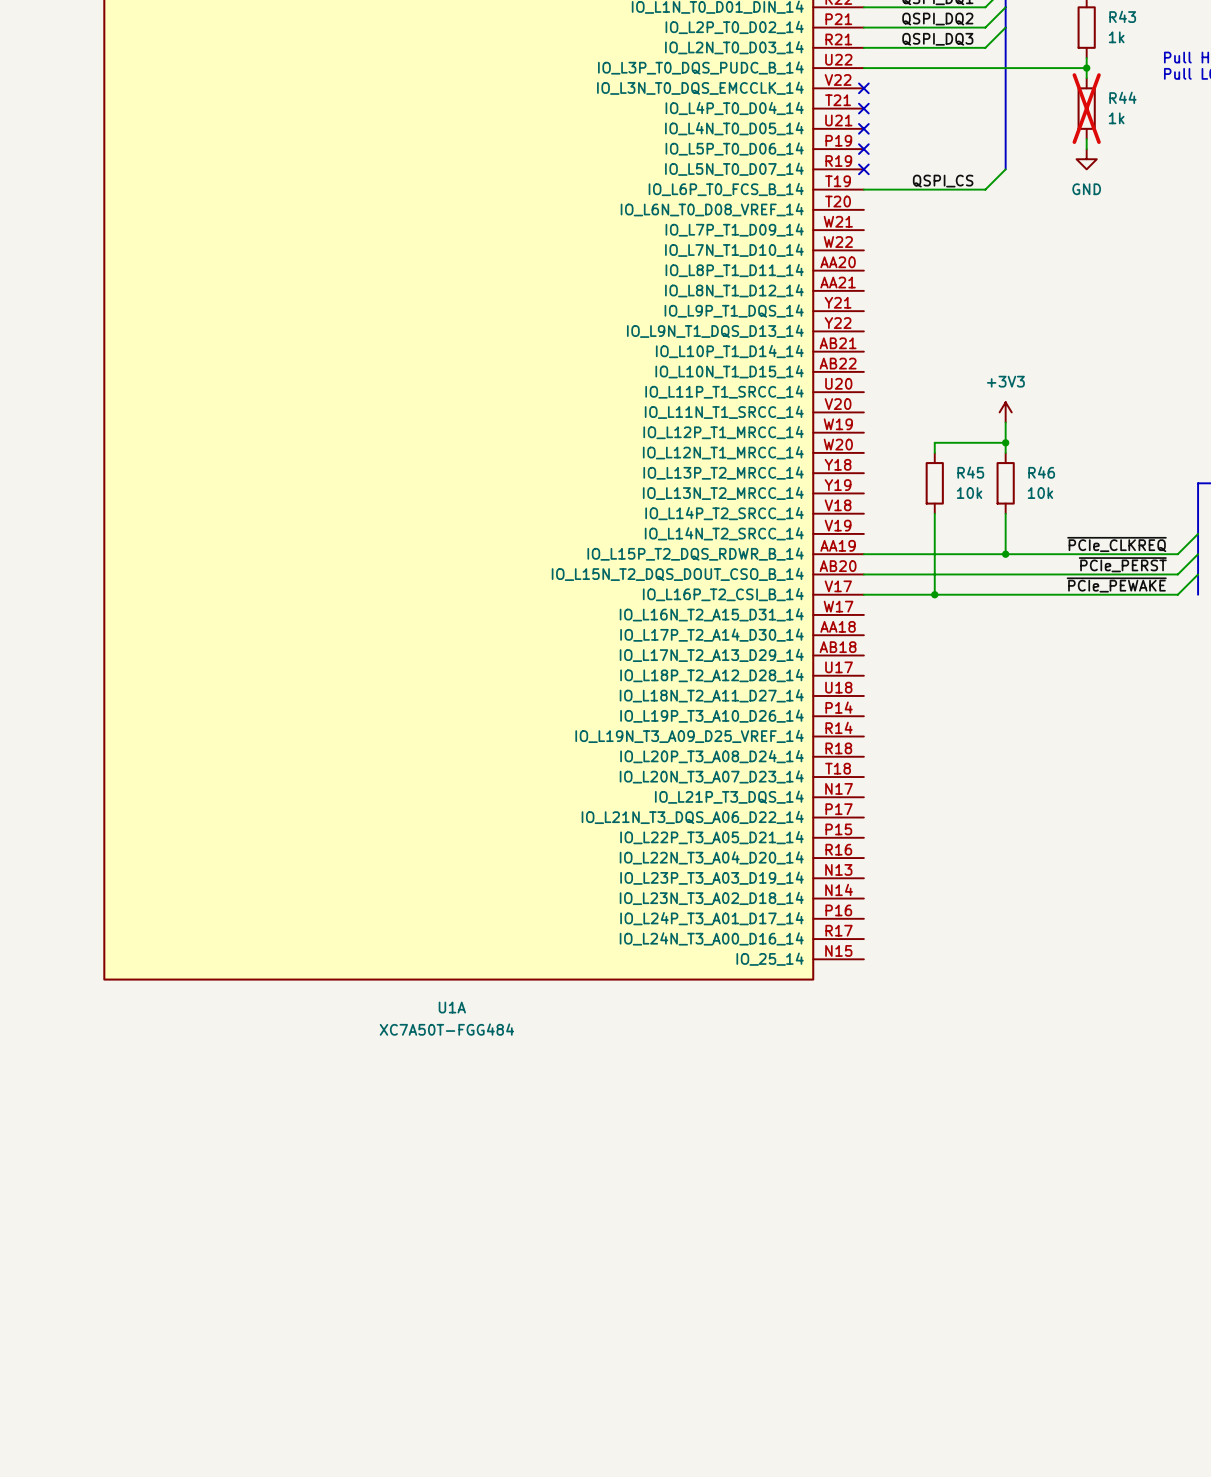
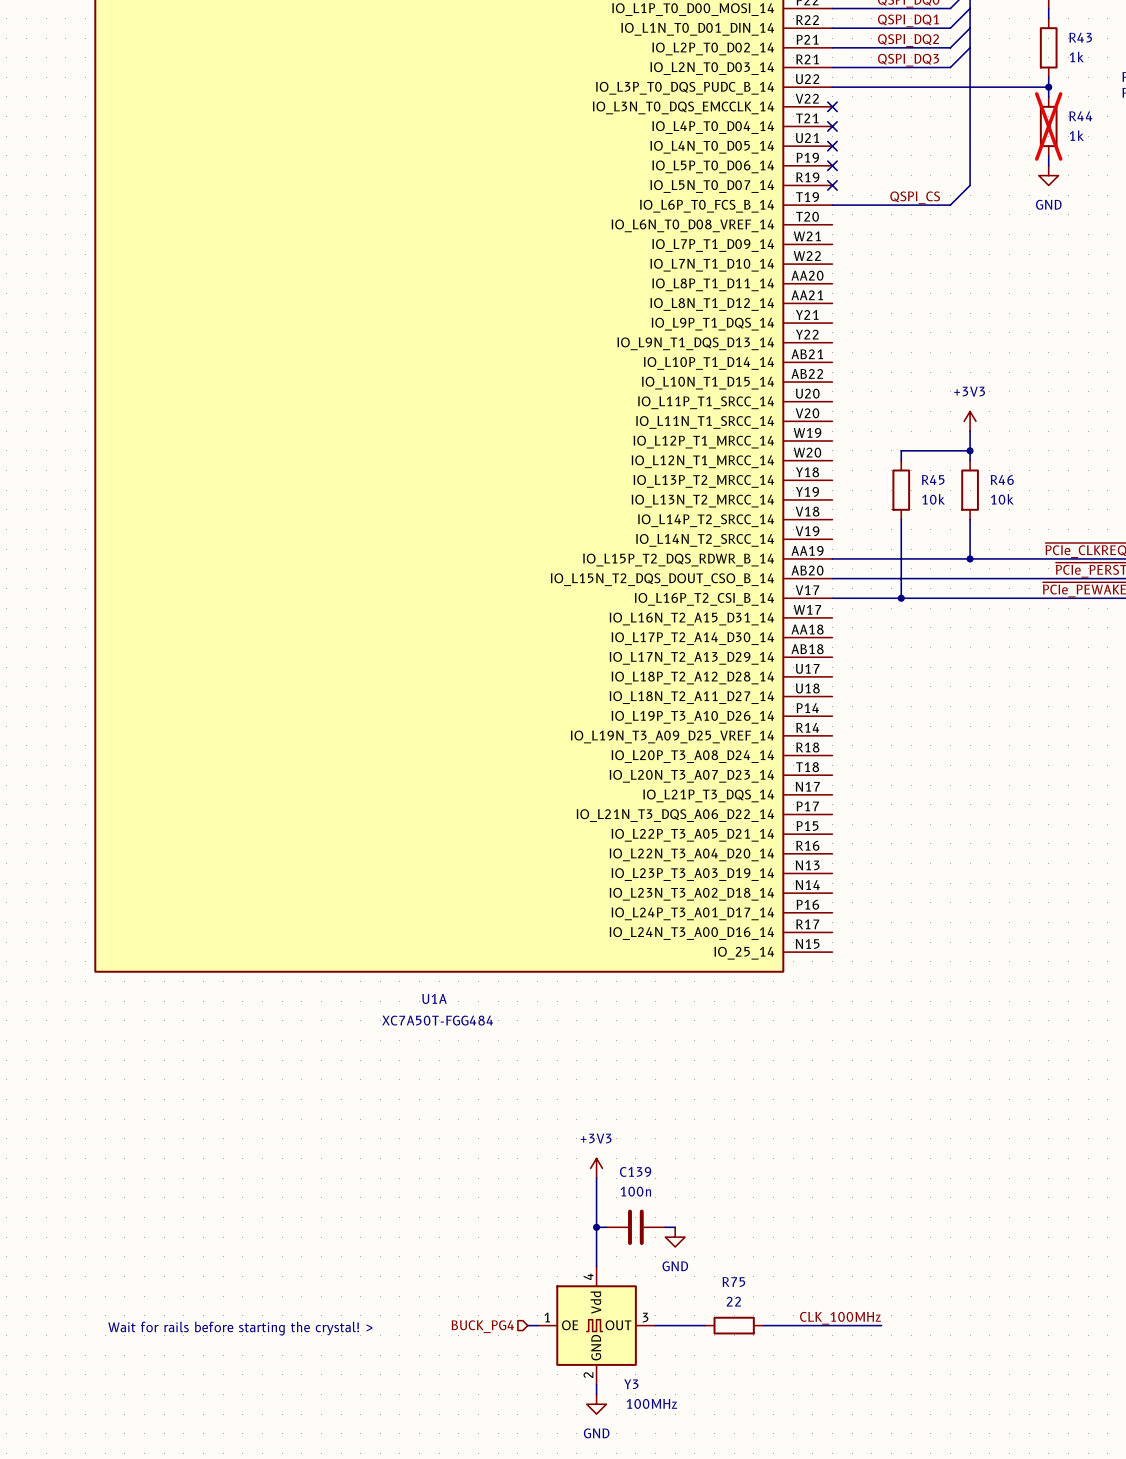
power symbol: none -> +3V3 (596, 1168)
wire: none -> (596, 1178) (596, 1266)
wire: none -> (596, 1227) (606, 1227)
junction: none -> (596, 1227)
C139: none -> 100n (635, 1227)
wire: none -> (665, 1227) (675, 1227)
power symbol: none -> GND (675, 1237)
label: none -> CLK_100MHz (840, 1318)
hierarchical label: none -> BUCK_PG4 (482, 1326)
wire: none -> (527, 1325) (537, 1325)
Y3: none -> 100MHz (596, 1325)
wire: none -> (655, 1325) (704, 1325)
R75: none -> 22 (734, 1325)
wire: none -> (763, 1325) (881, 1325)
text: none -> Wait for rails before starting the crystal! > (240, 1328)
wire: none -> (596, 1384) (596, 1394)
power symbol: none -> GND (596, 1404)

